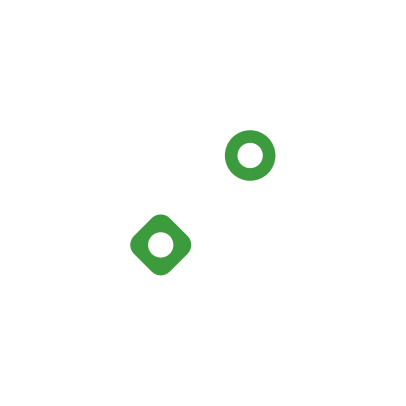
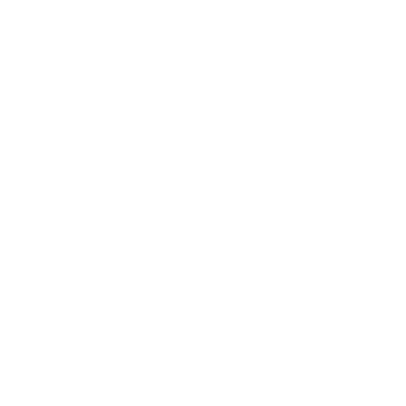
part: (202, 202) -> none

